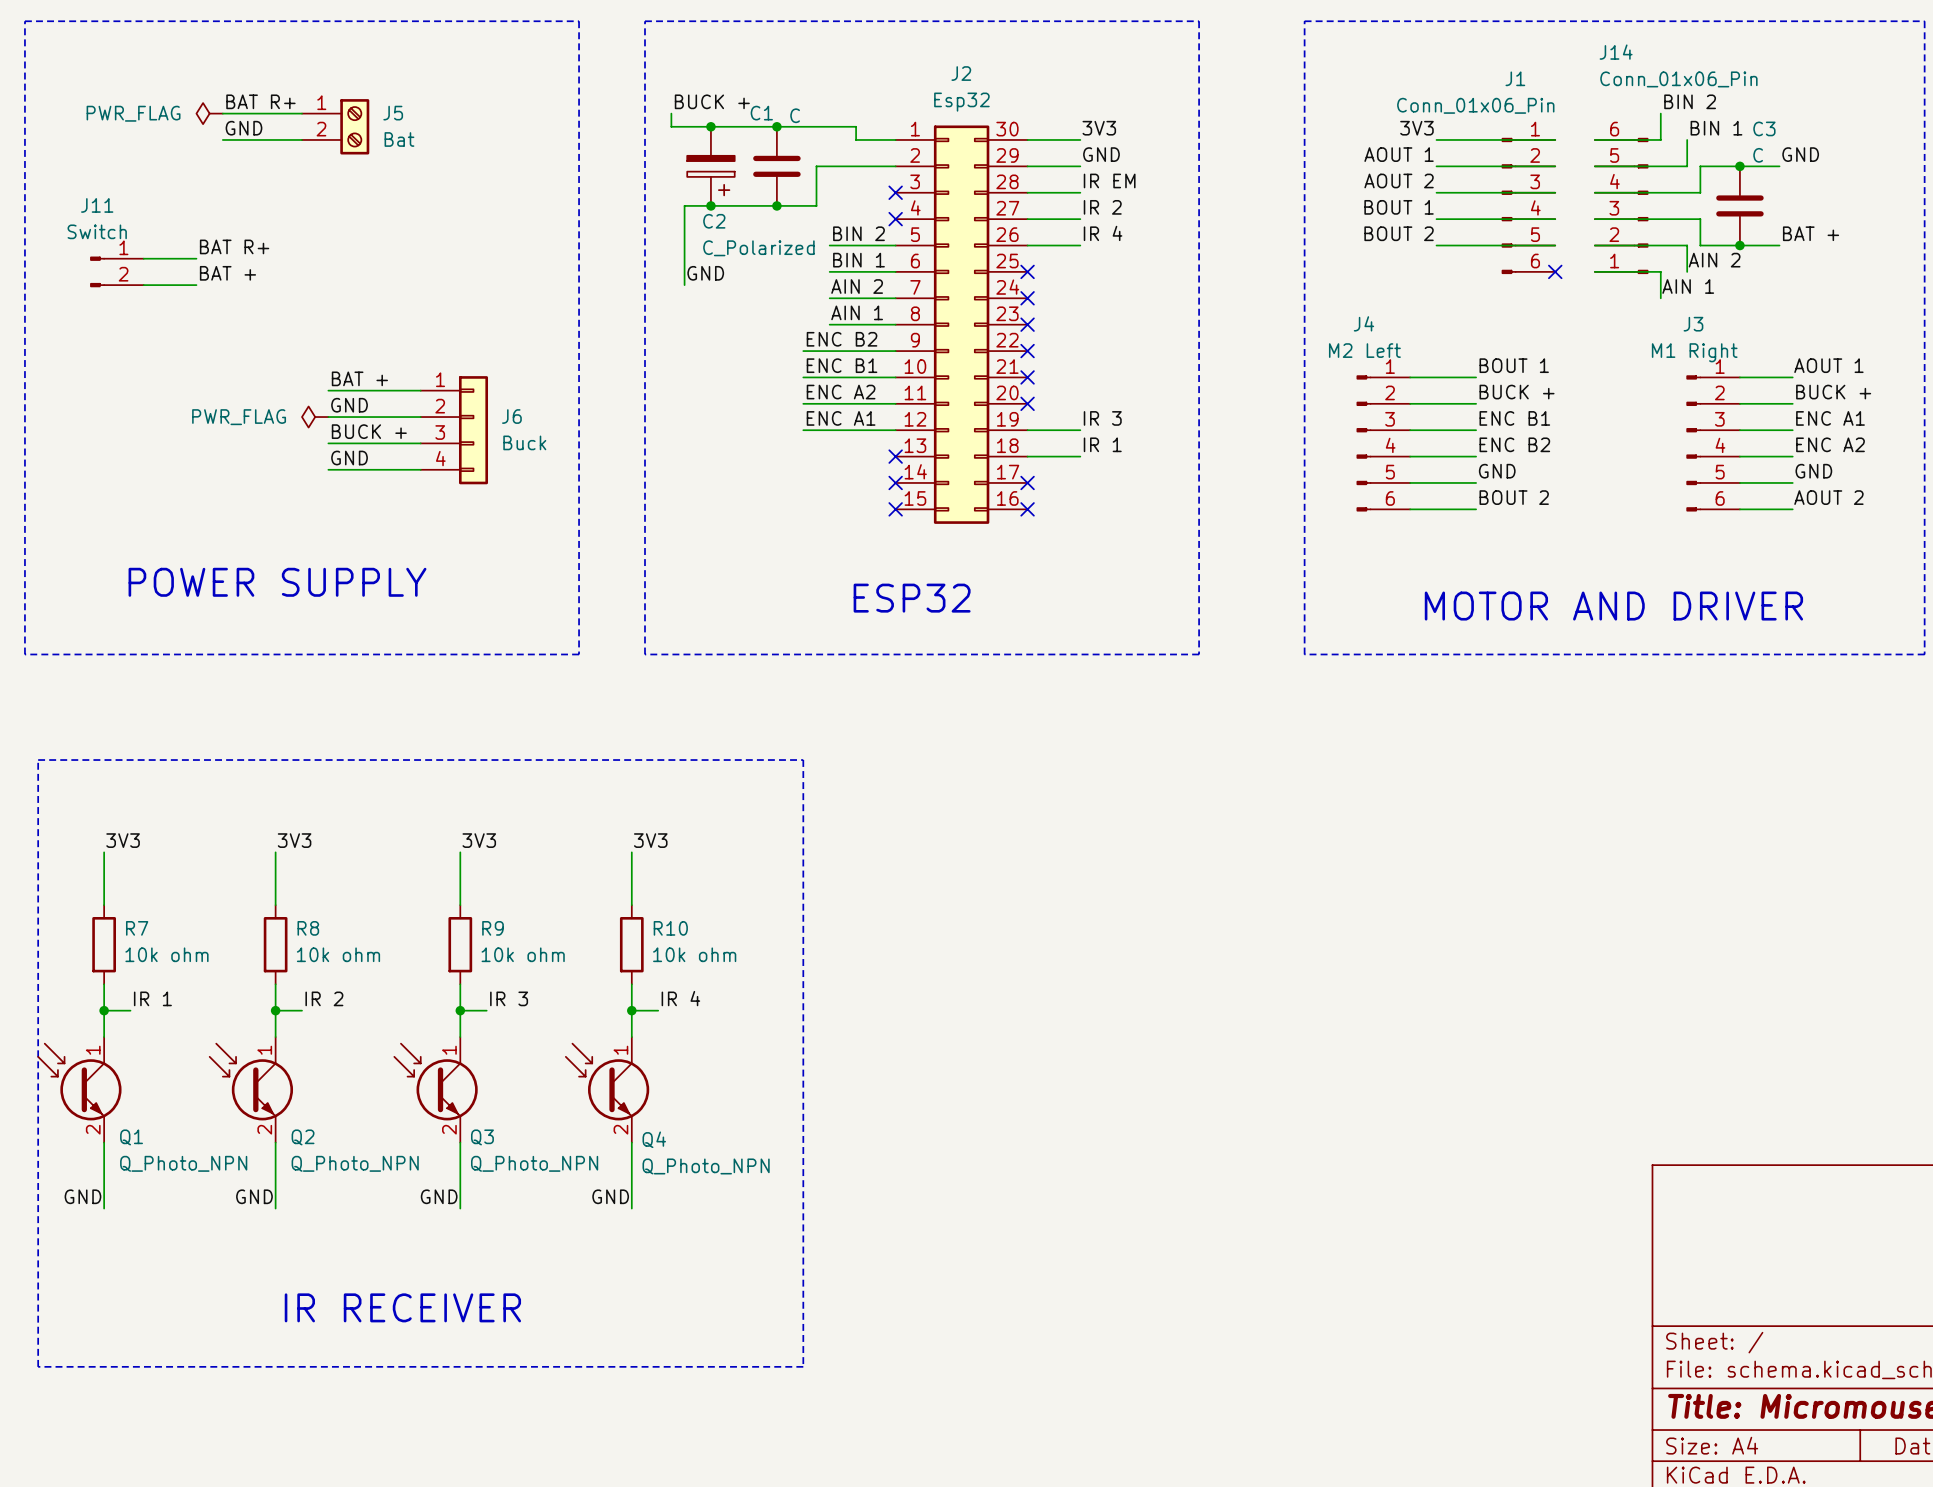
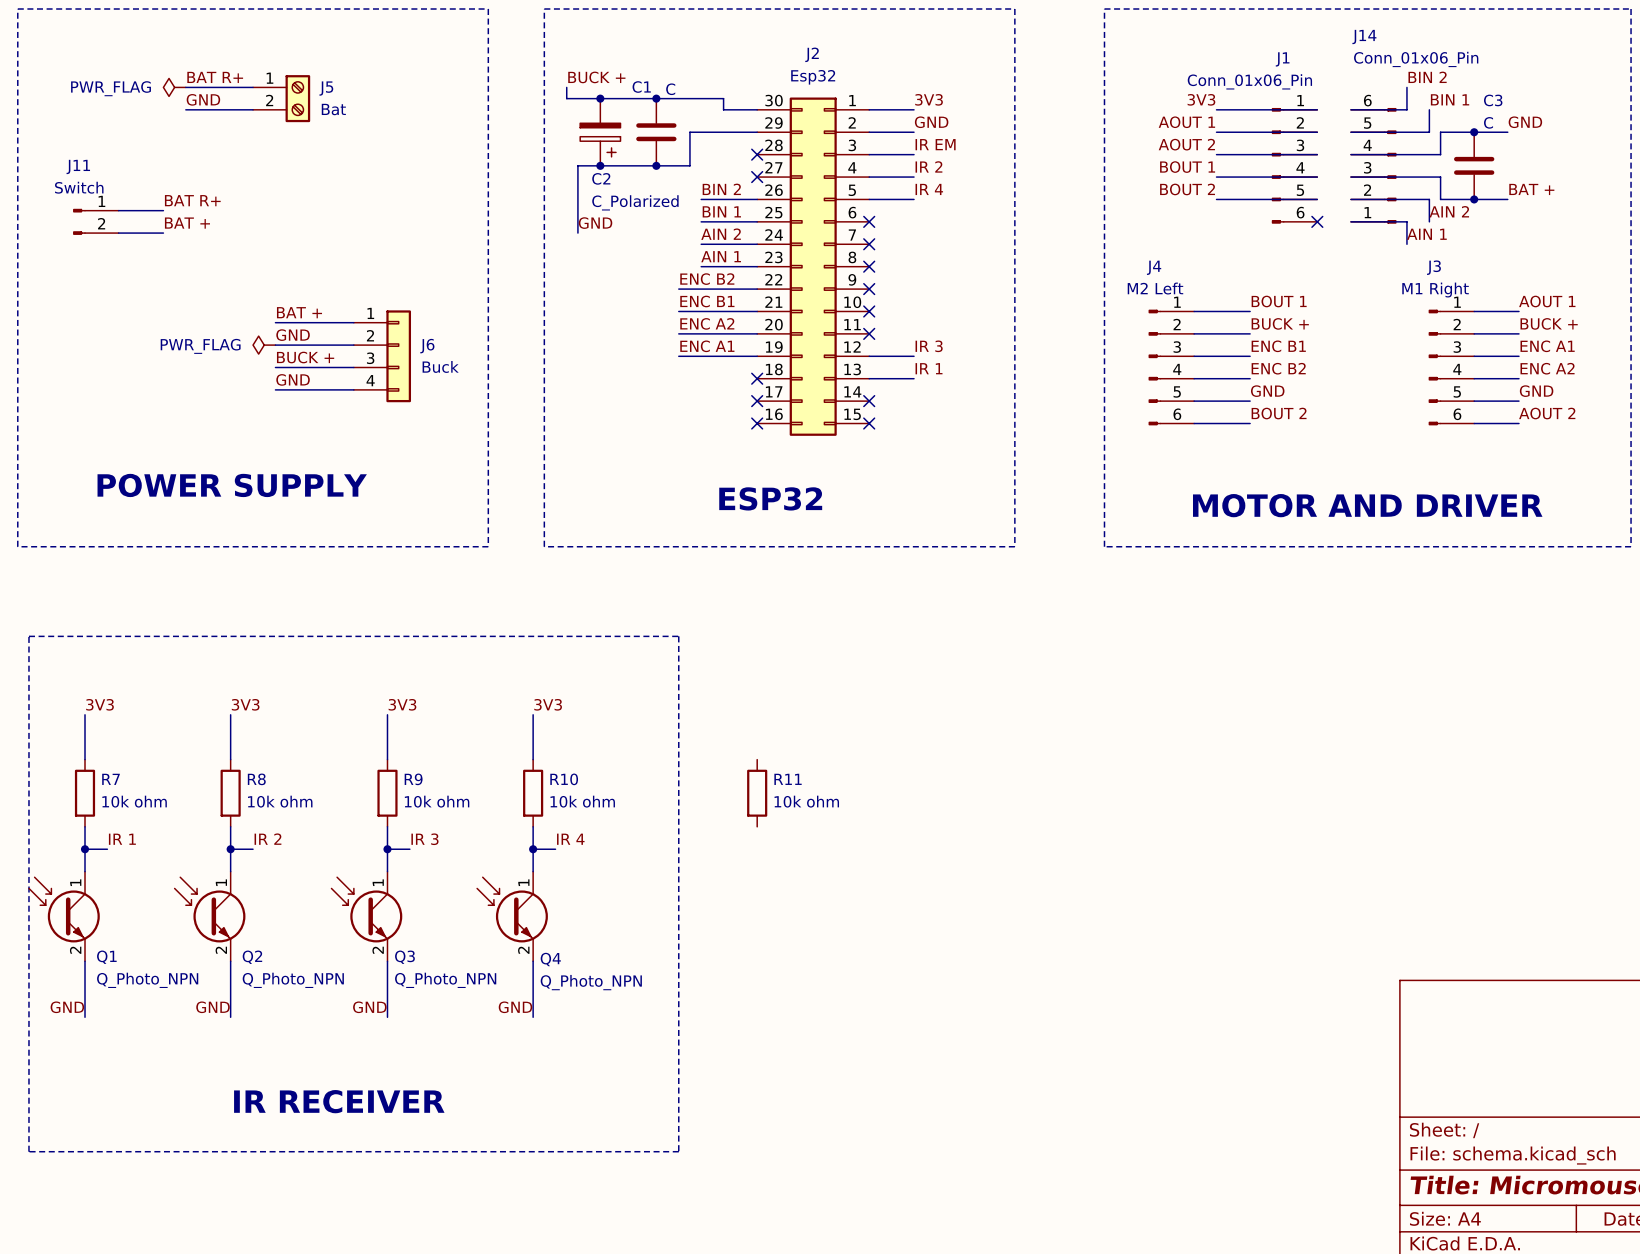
J2 flip: as is (961, 324) -> left-right (813, 266)
R11: none -> 10k ohm (757, 793)

